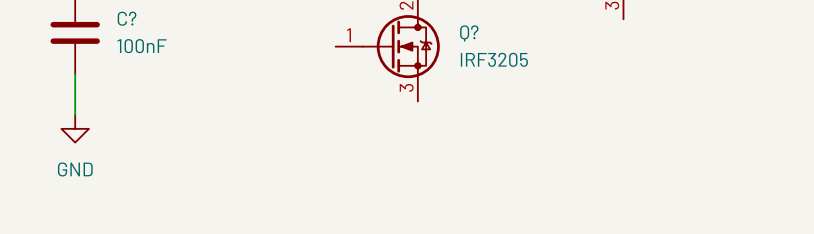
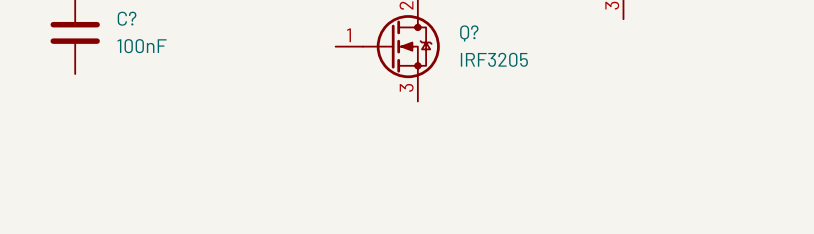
wire: (75, 74) (75, 115) -> none
power symbol: GND (75, 128) -> none

